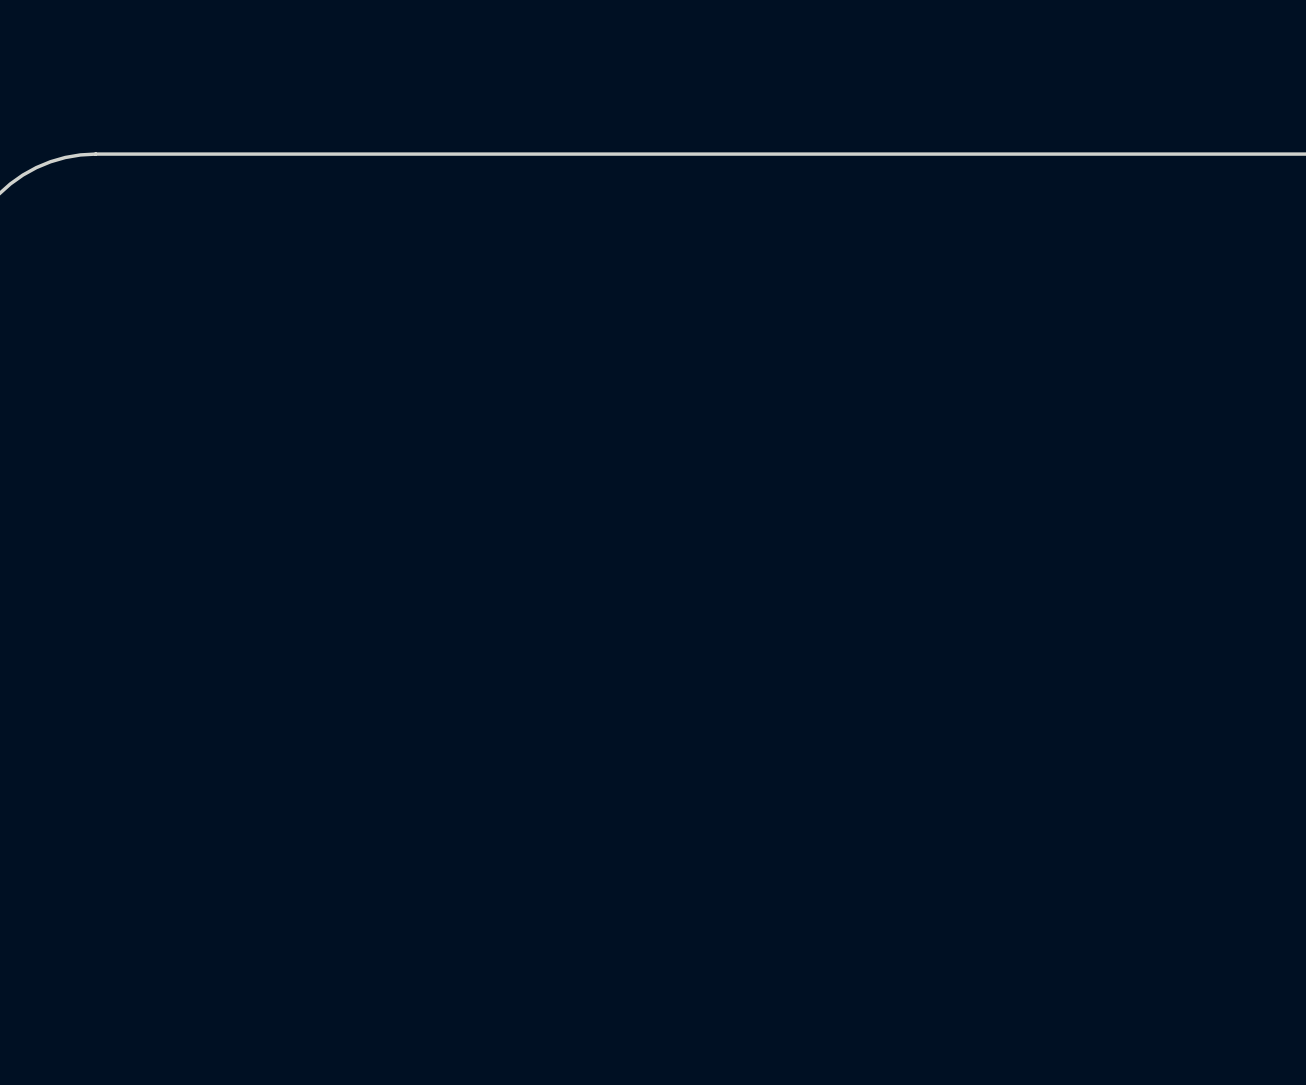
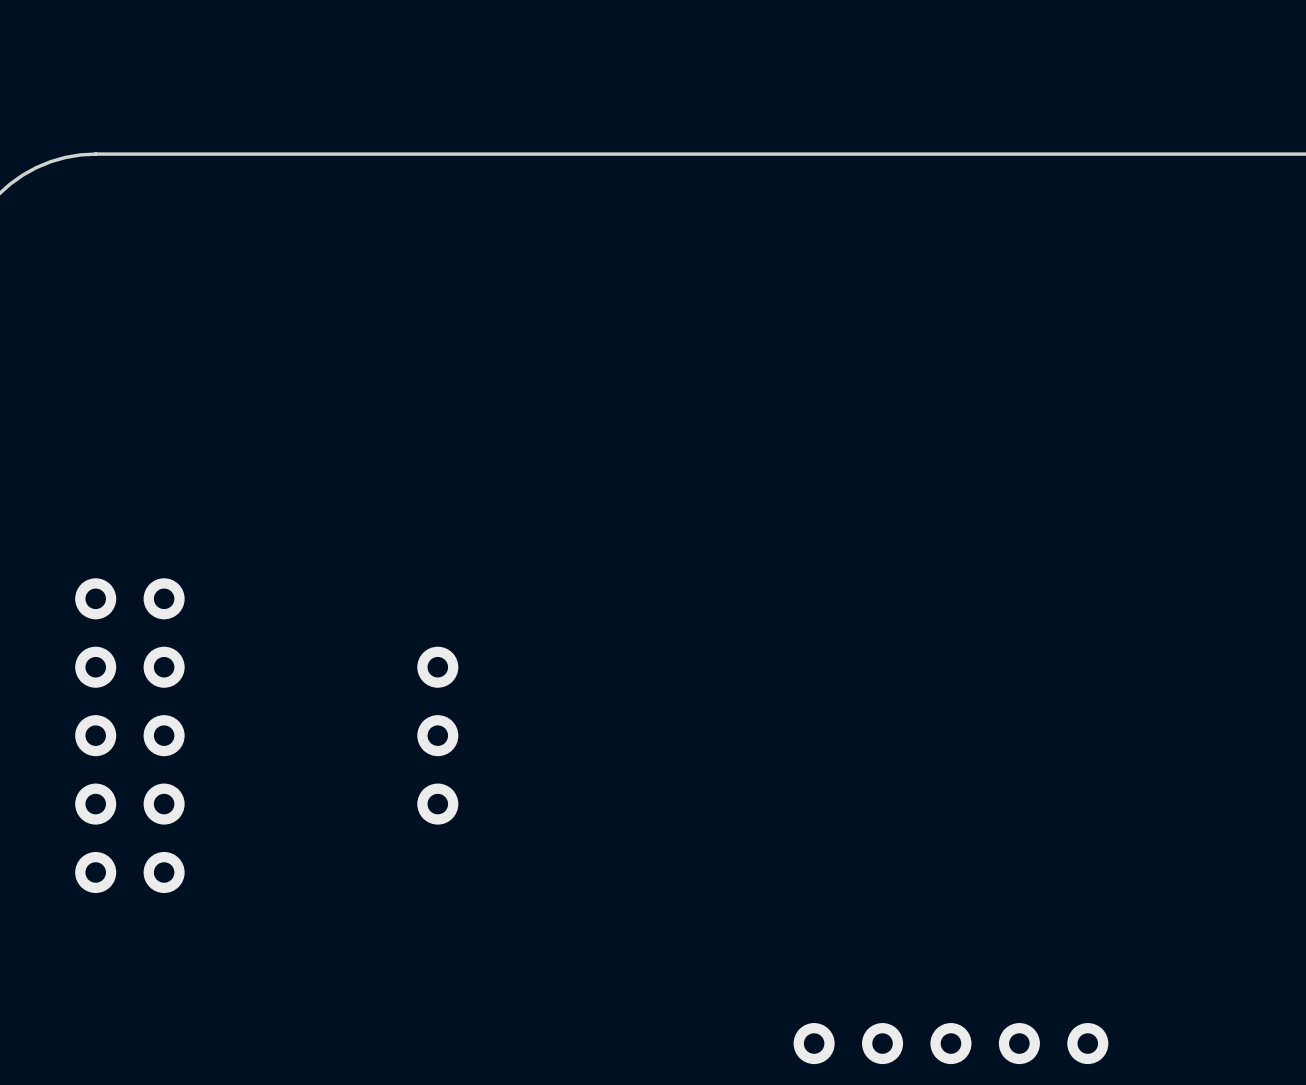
via: none -> (95, 598)
via: none -> (164, 598)
via: none -> (95, 667)
via: none -> (164, 667)
via: none -> (437, 667)
via: none -> (95, 735)
via: none -> (164, 735)
via: none -> (437, 735)
via: none -> (95, 804)
via: none -> (164, 804)
via: none -> (437, 804)
via: none -> (95, 872)
via: none -> (164, 872)
via: none -> (814, 1043)
via: none -> (882, 1043)
via: none -> (950, 1043)
via: none -> (1019, 1043)
via: none -> (1087, 1043)

